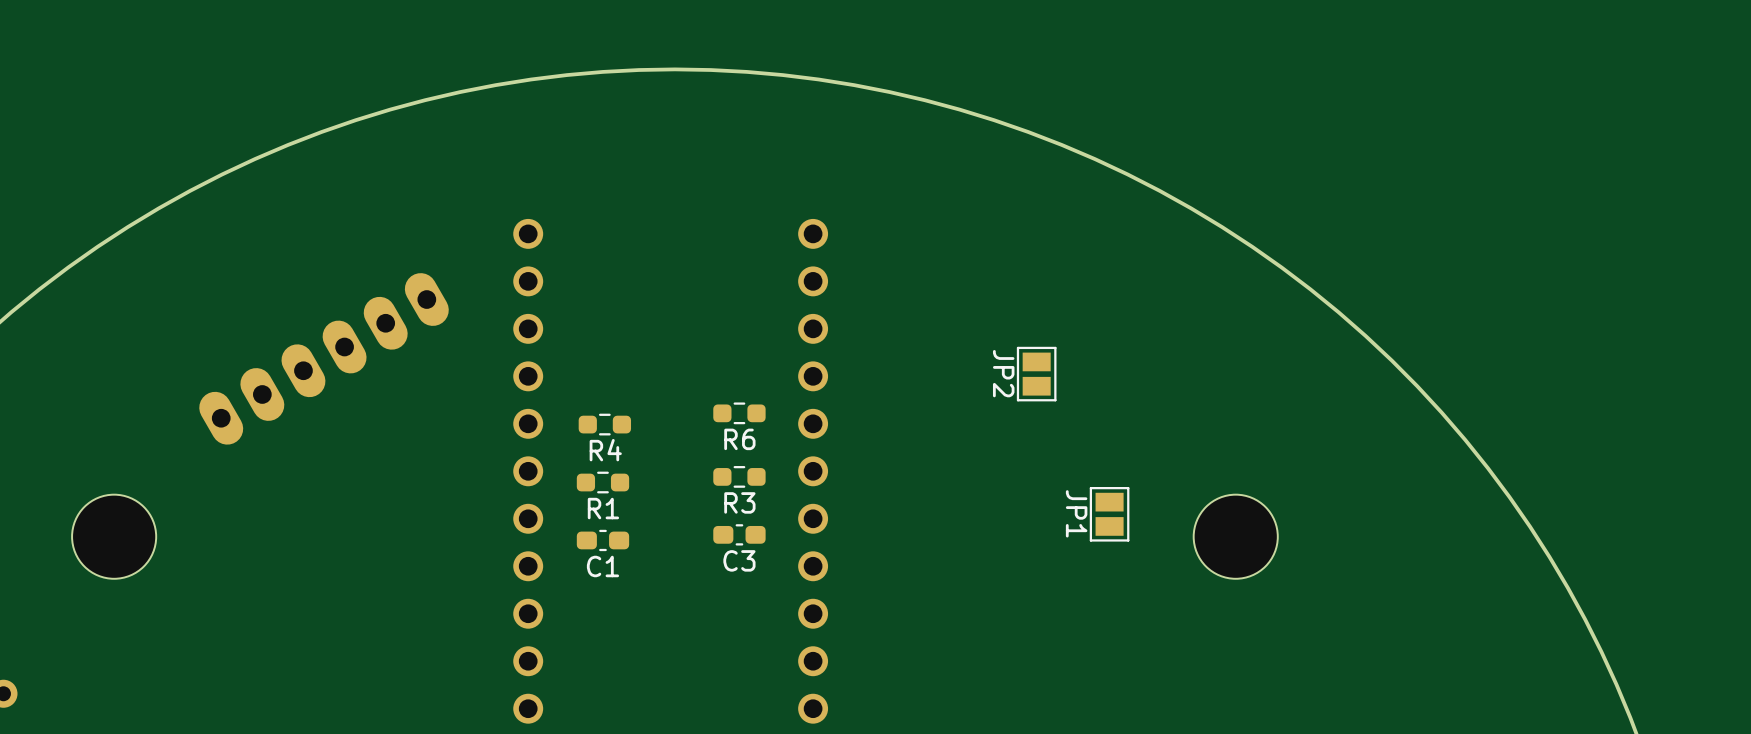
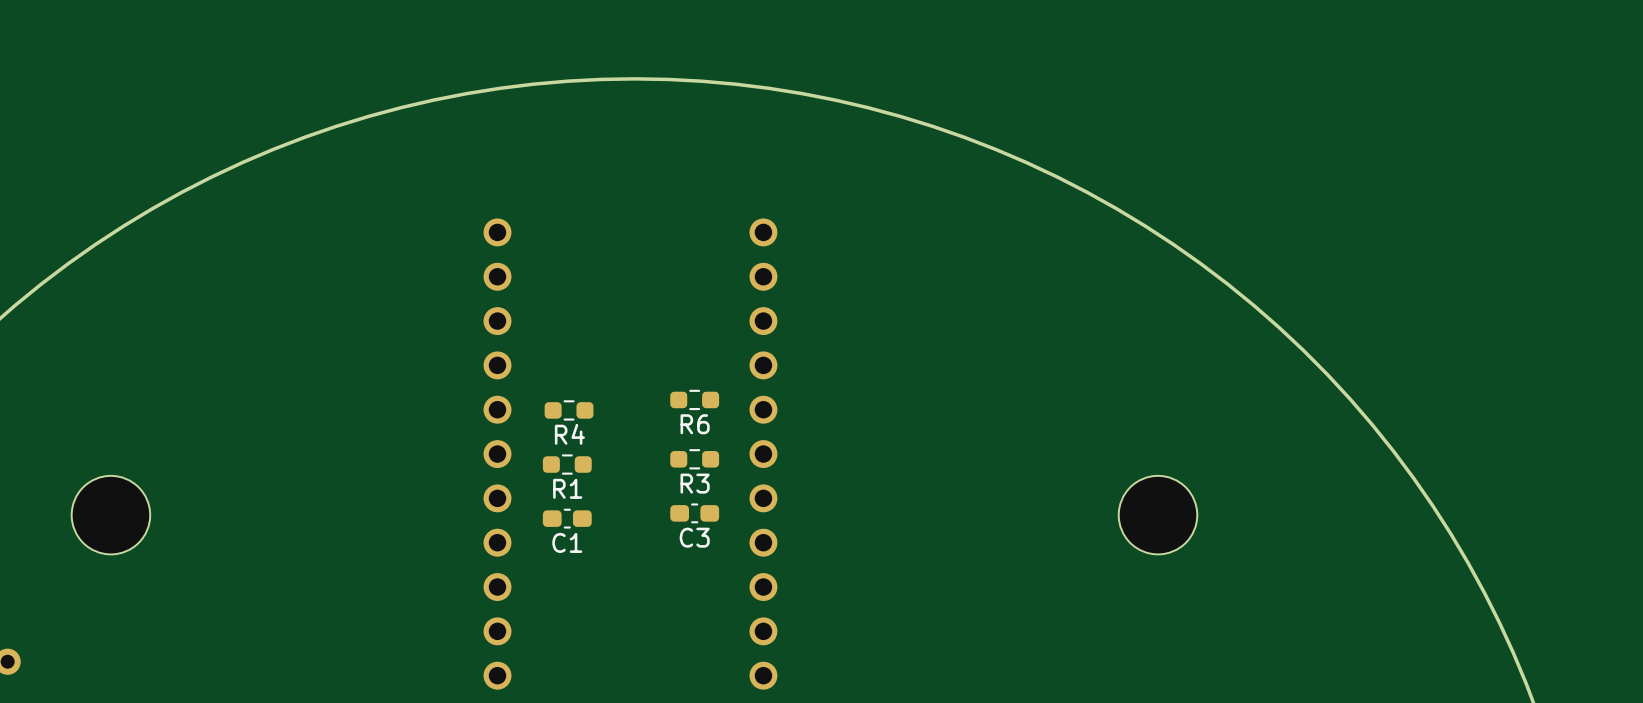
part: (324, 358) -> none
JP2: (1036, 374) -> none
JP1: (1109, 514) -> none

